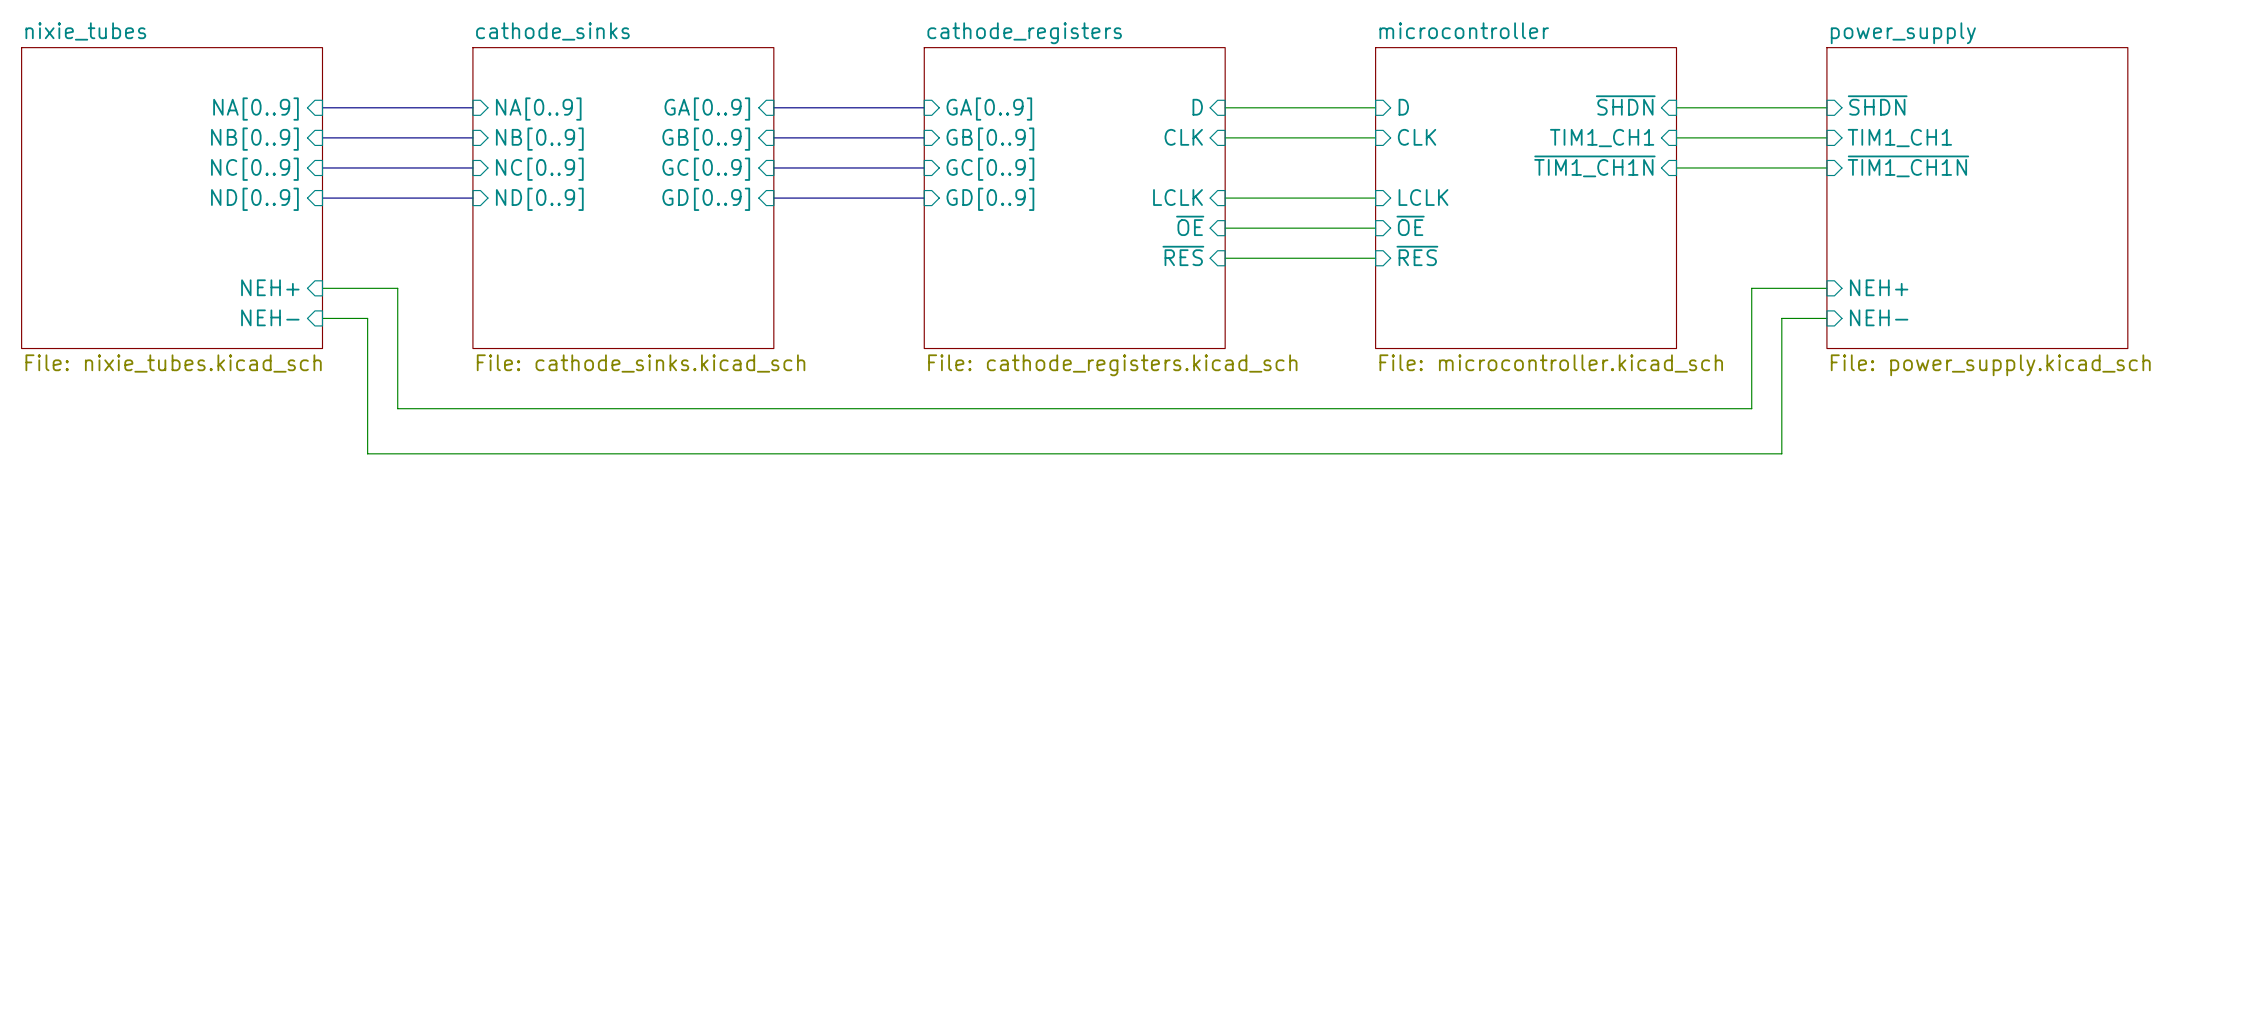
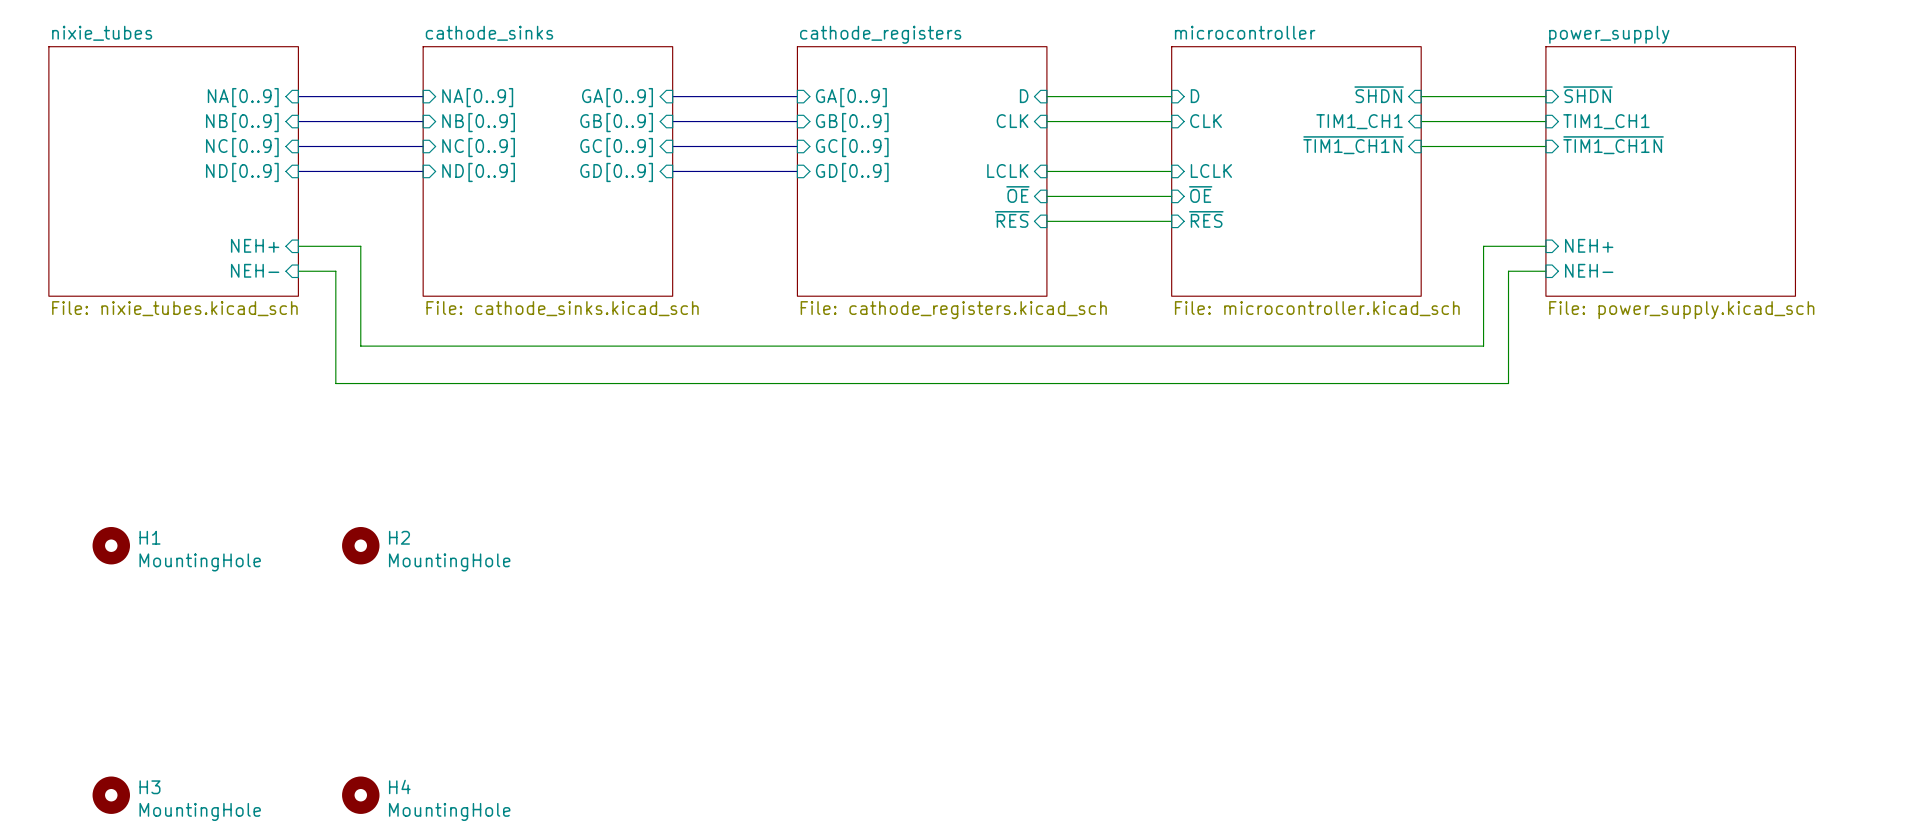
H1: none -> MountingHole (111, 545)
H2: none -> MountingHole (360, 545)
H3: none -> MountingHole (111, 795)
H4: none -> MountingHole (360, 795)

